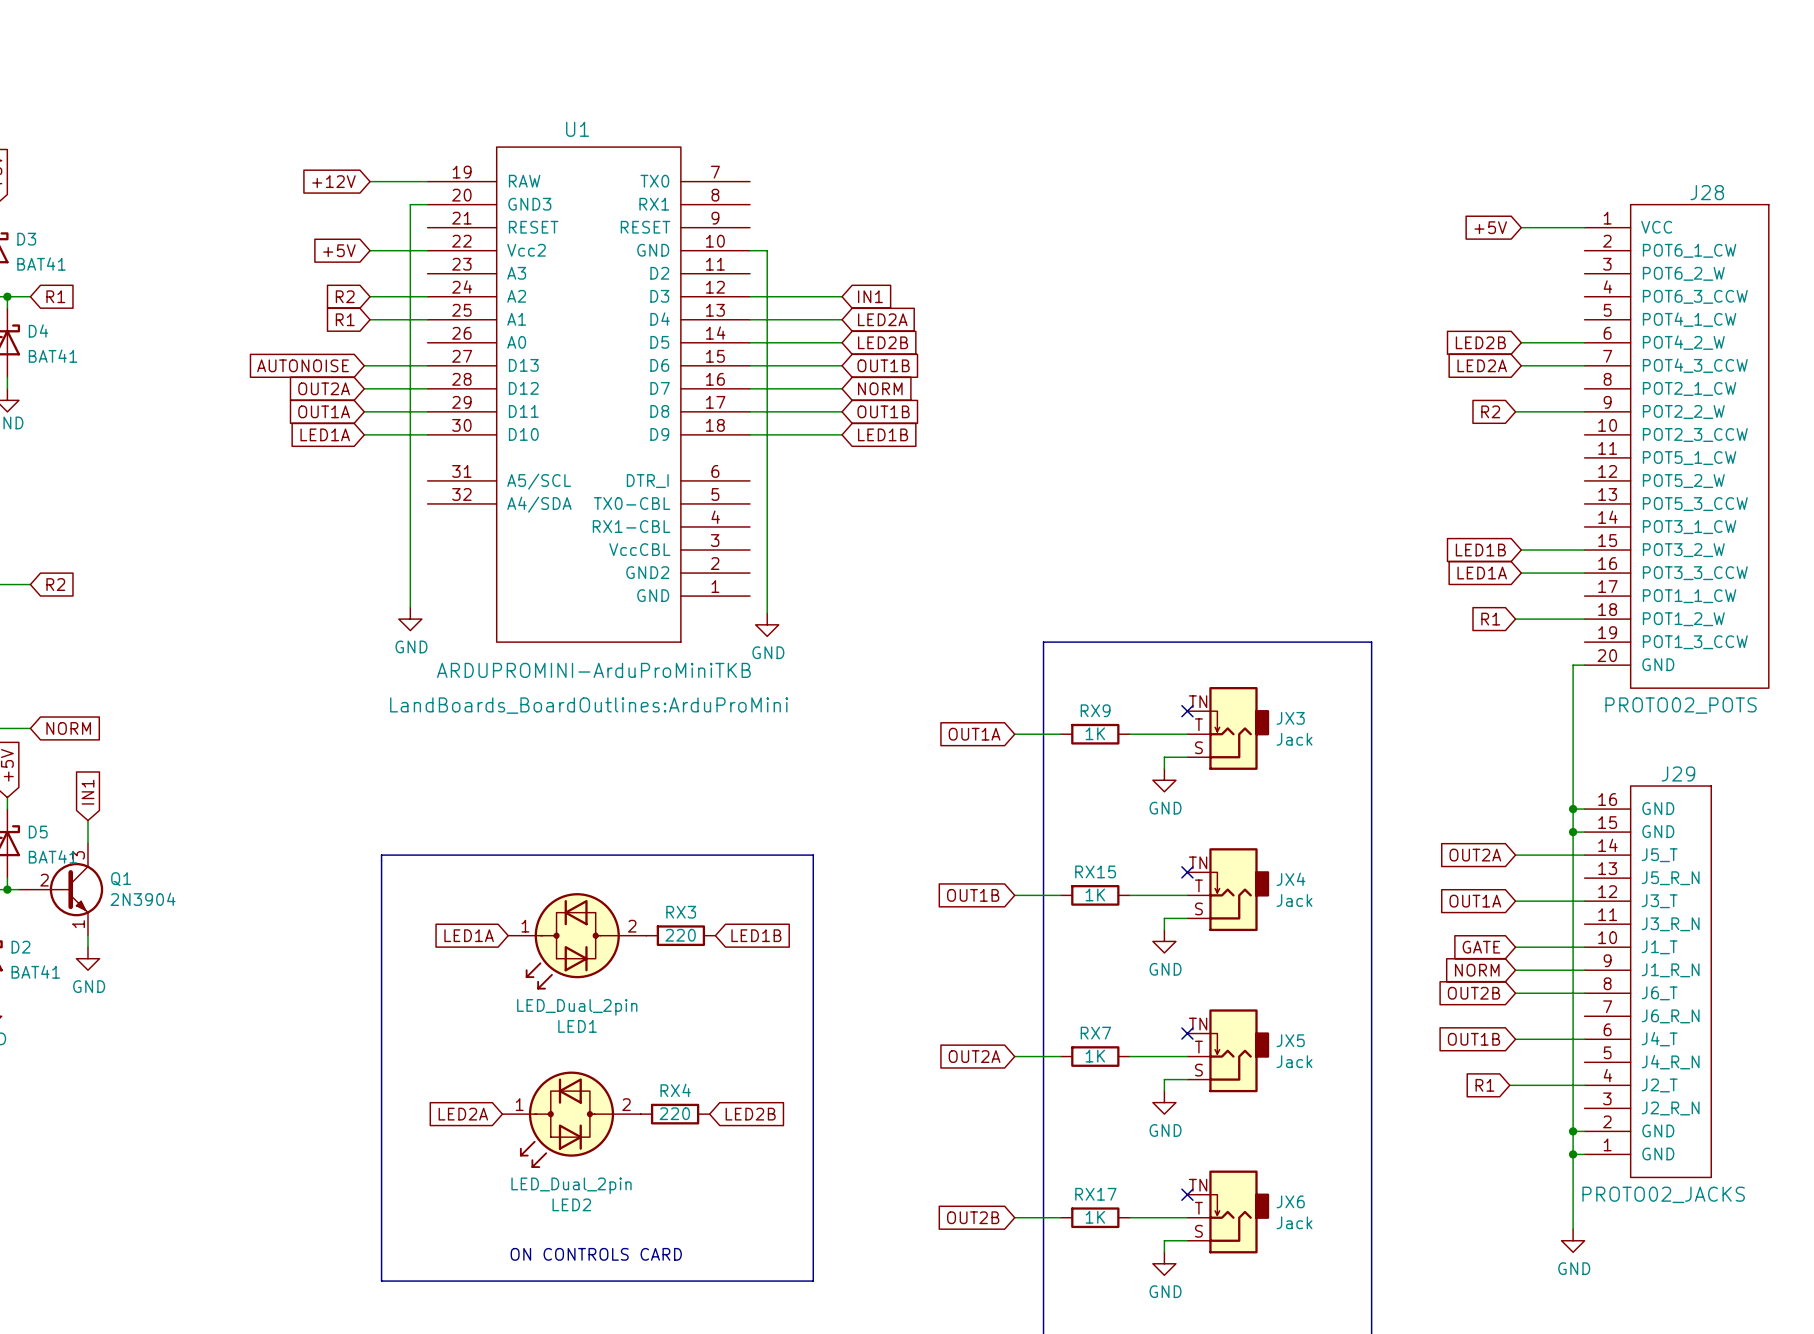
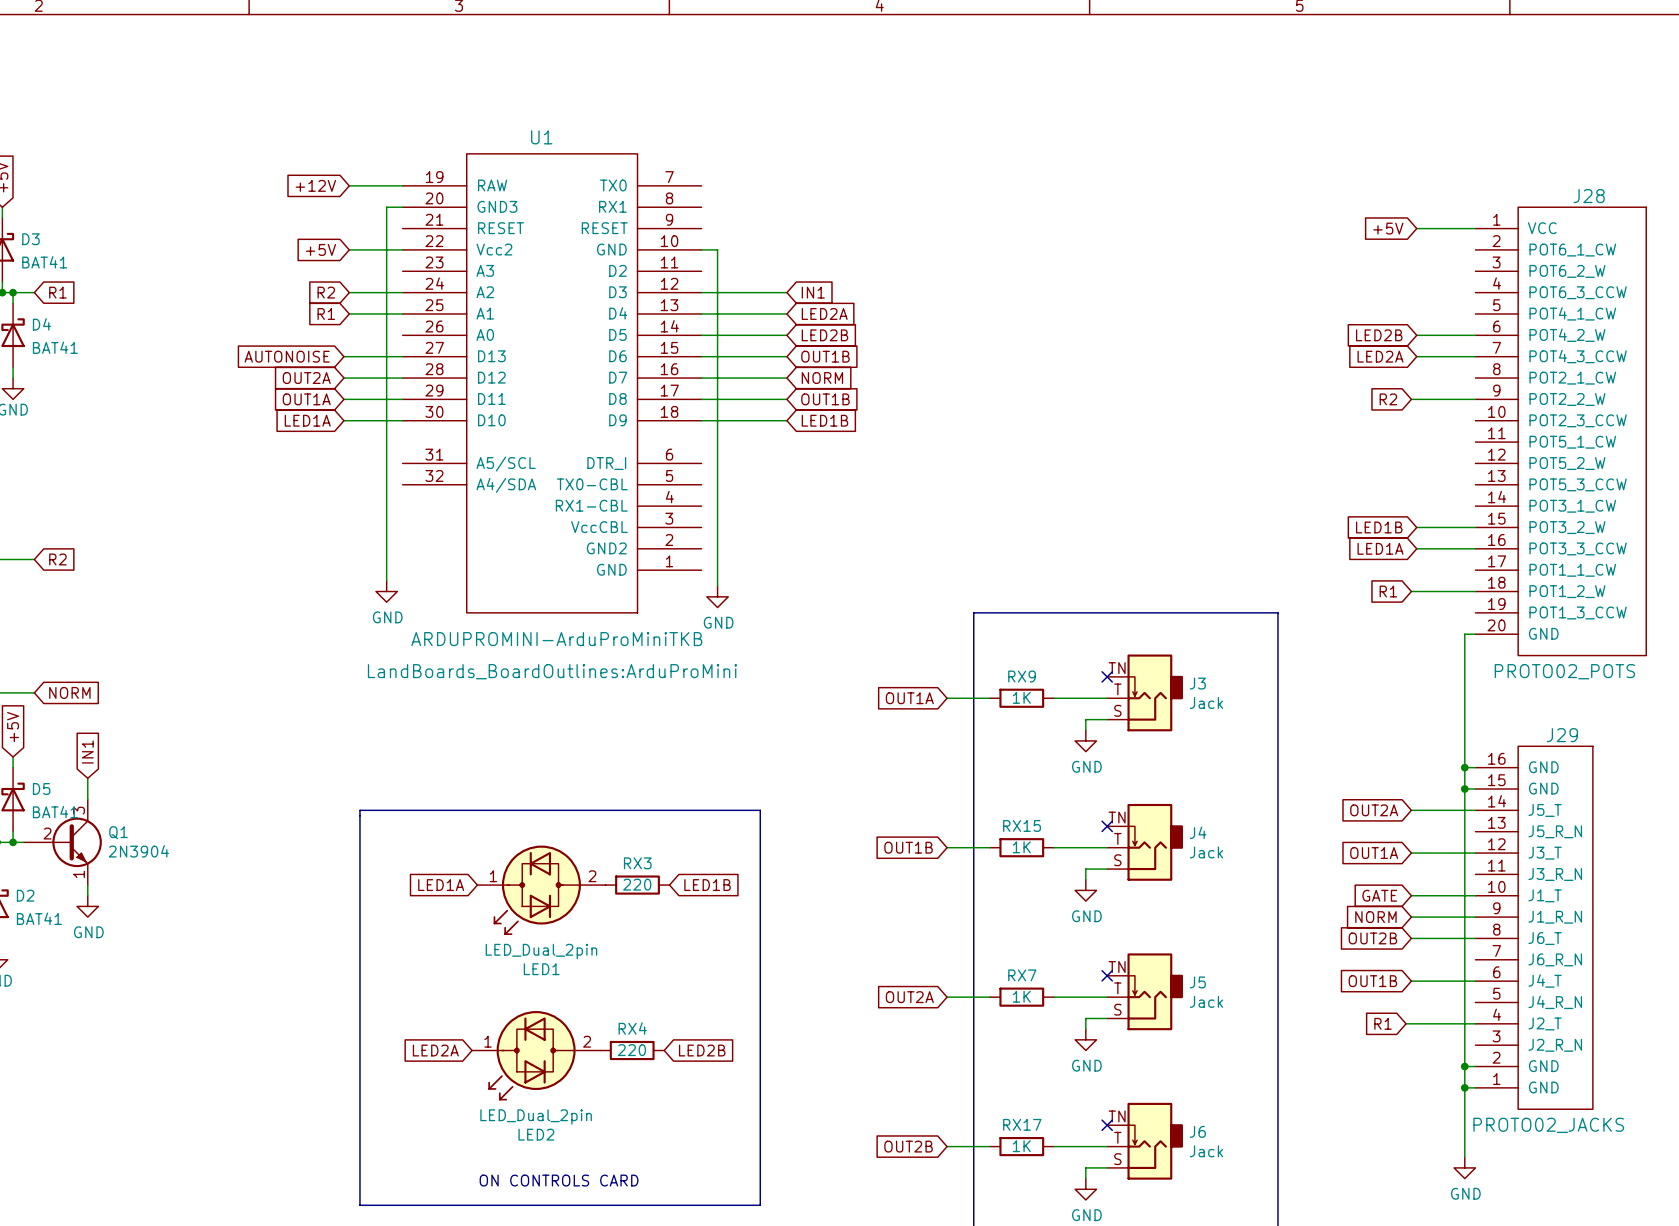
JX3 name: JX3 (1290, 718) -> J3 (1197, 683)
JX4 name: JX4 (1290, 879) -> J4 (1198, 832)
JX5 name: JX5 (1290, 1040) -> J5 (1197, 982)
JX6 name: JX6 (1290, 1201) -> J6 (1197, 1131)

